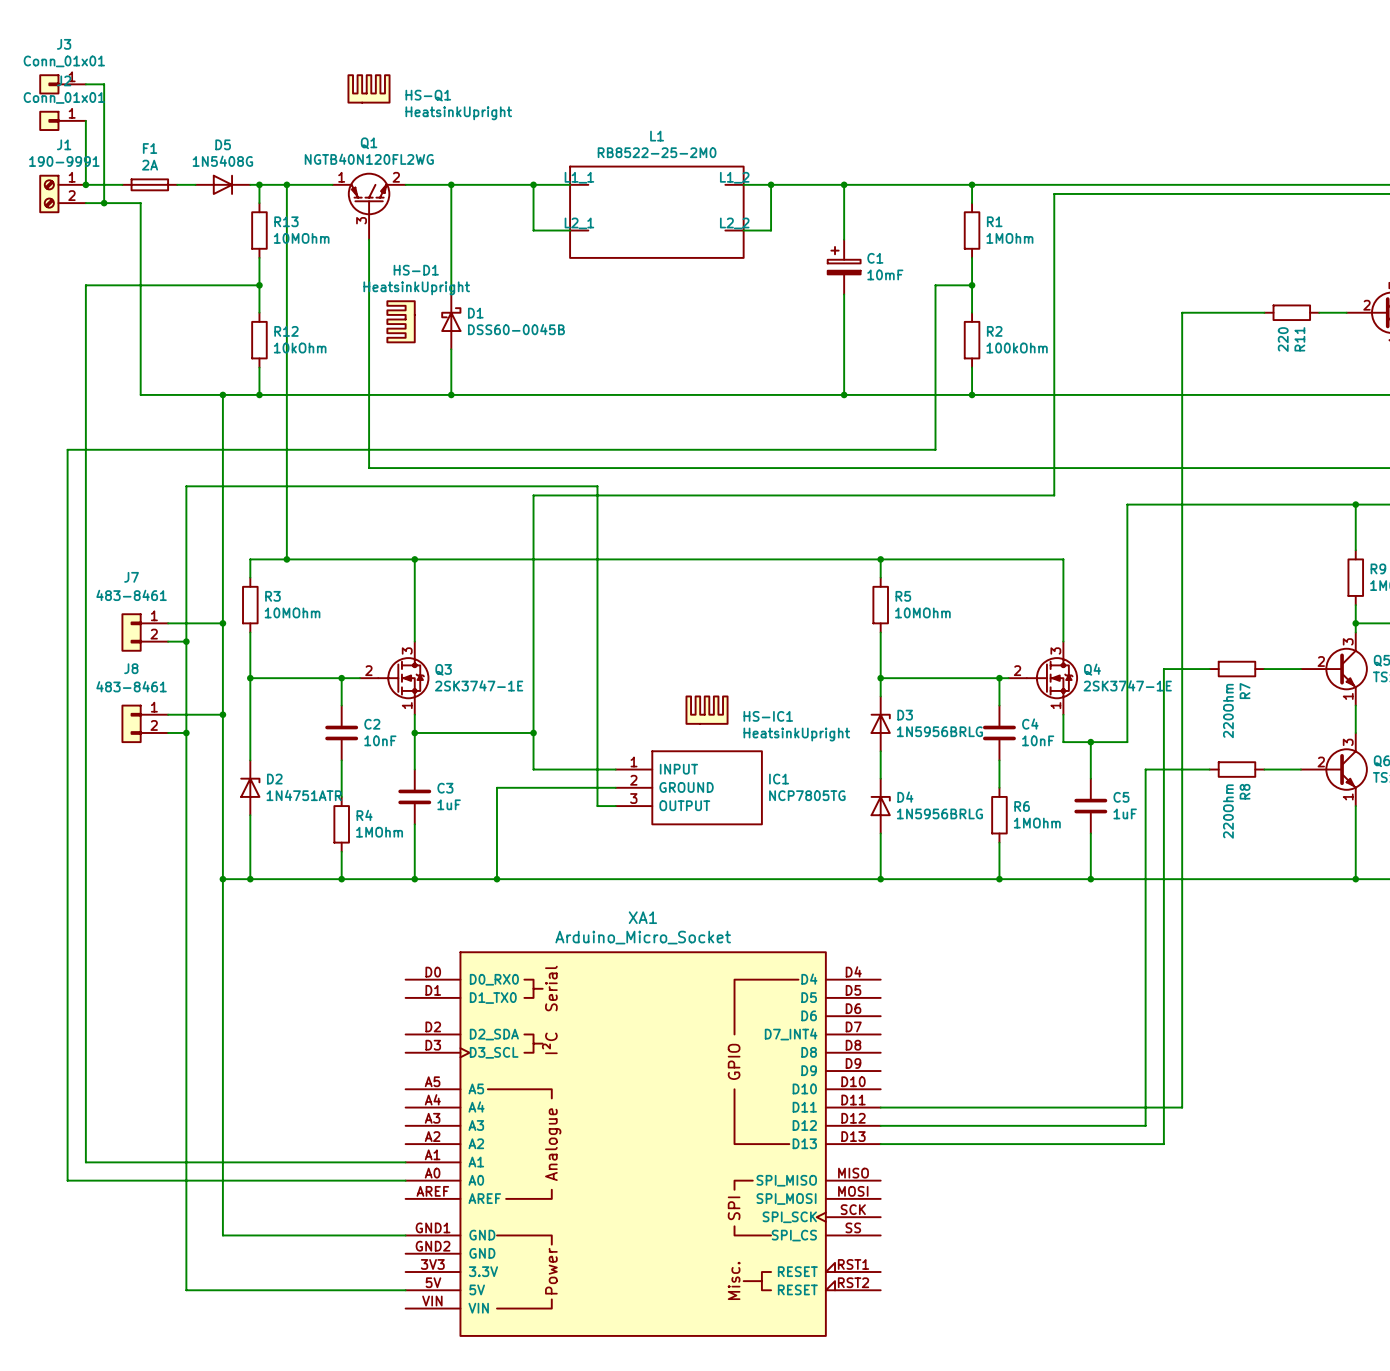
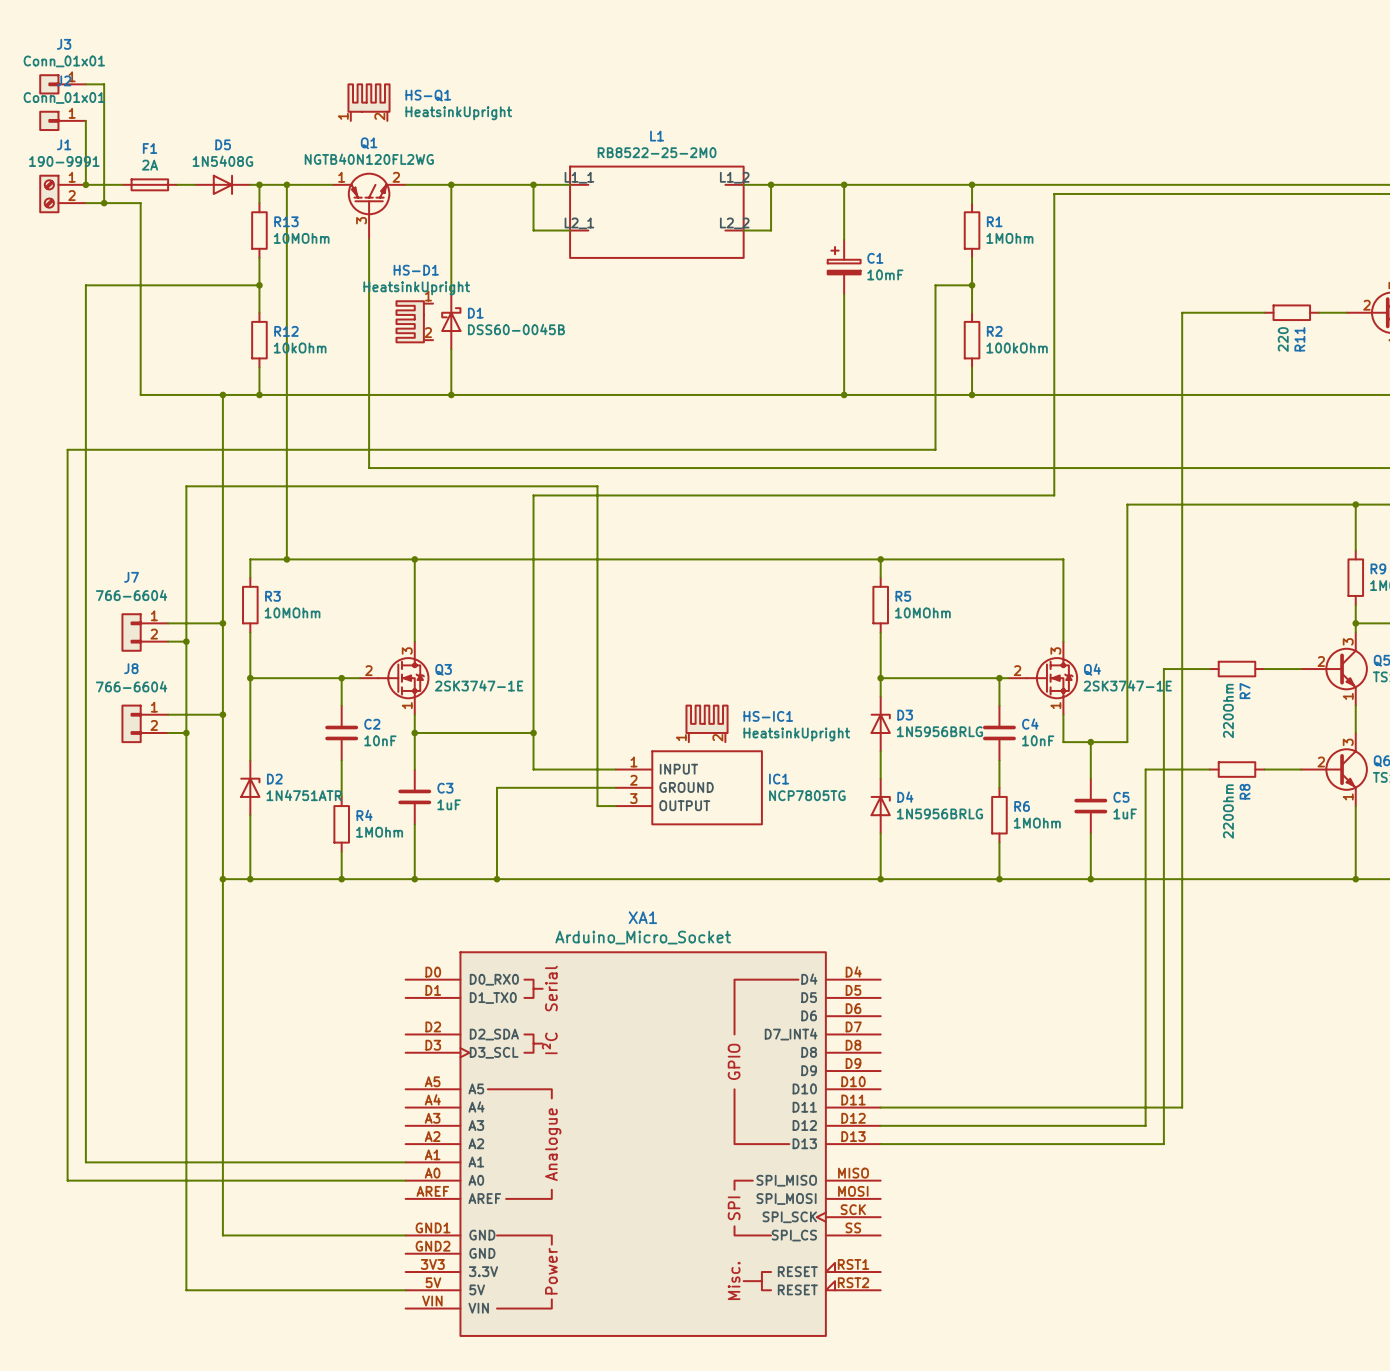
HS-Q1 symbol: [347, 74, 391, 104] -> [347, 83, 391, 121]
HS-D1 symbol: [386, 300, 416, 344] -> [395, 300, 434, 344]
J7 value: 483-8461 (131, 595) -> 766-6604 (131, 595)
J8 value: 483-8461 (131, 686) -> 766-6604 (131, 686)
HS-IC1 symbol: [685, 695, 729, 725] -> [685, 704, 729, 743]

